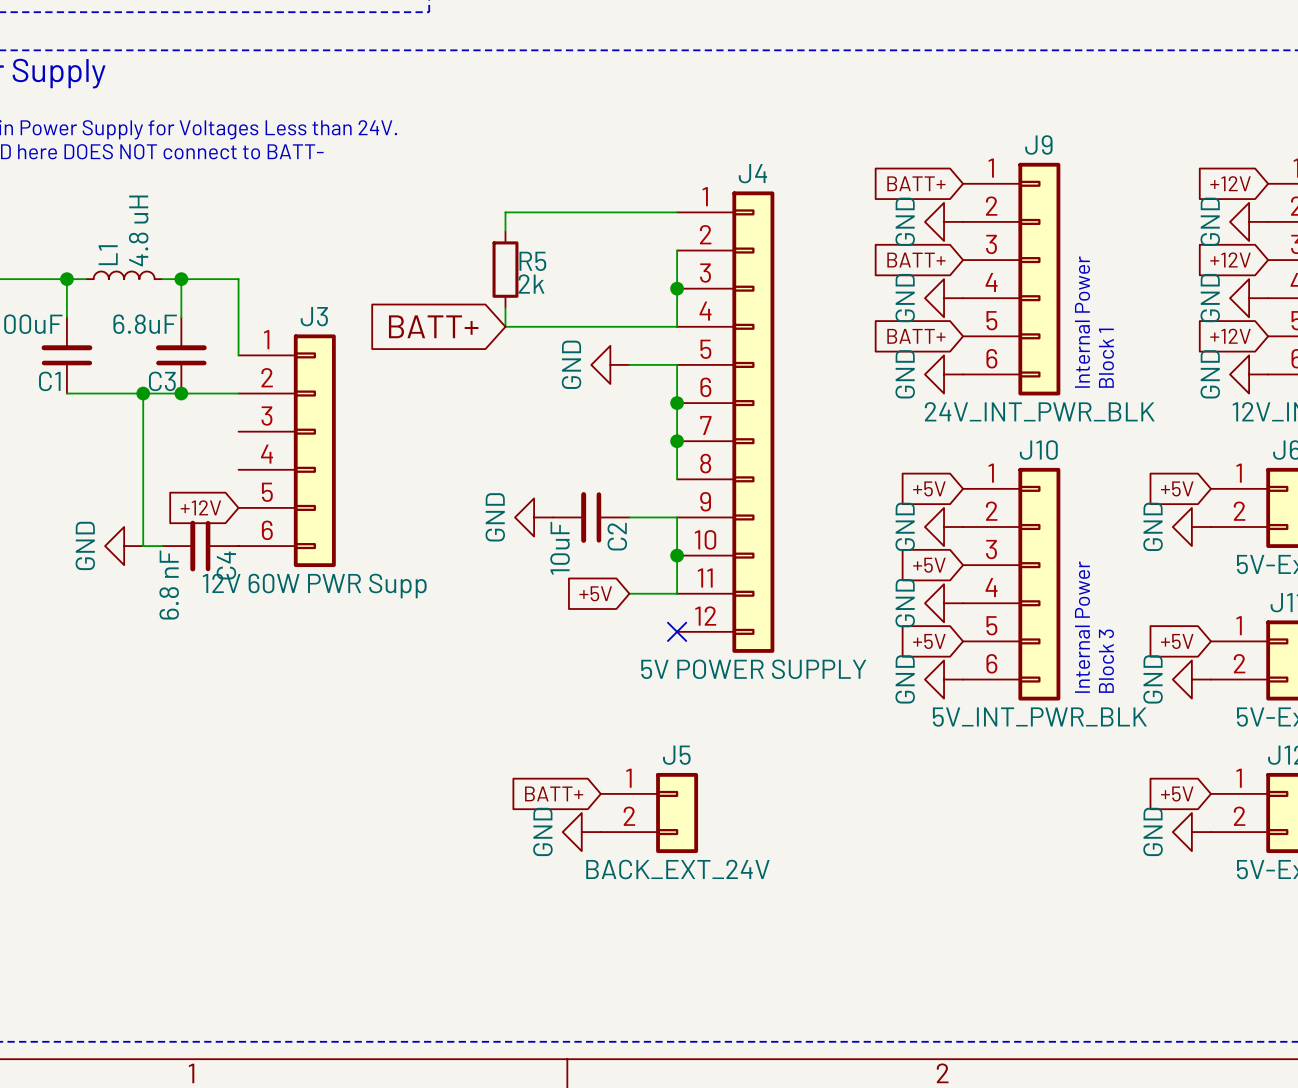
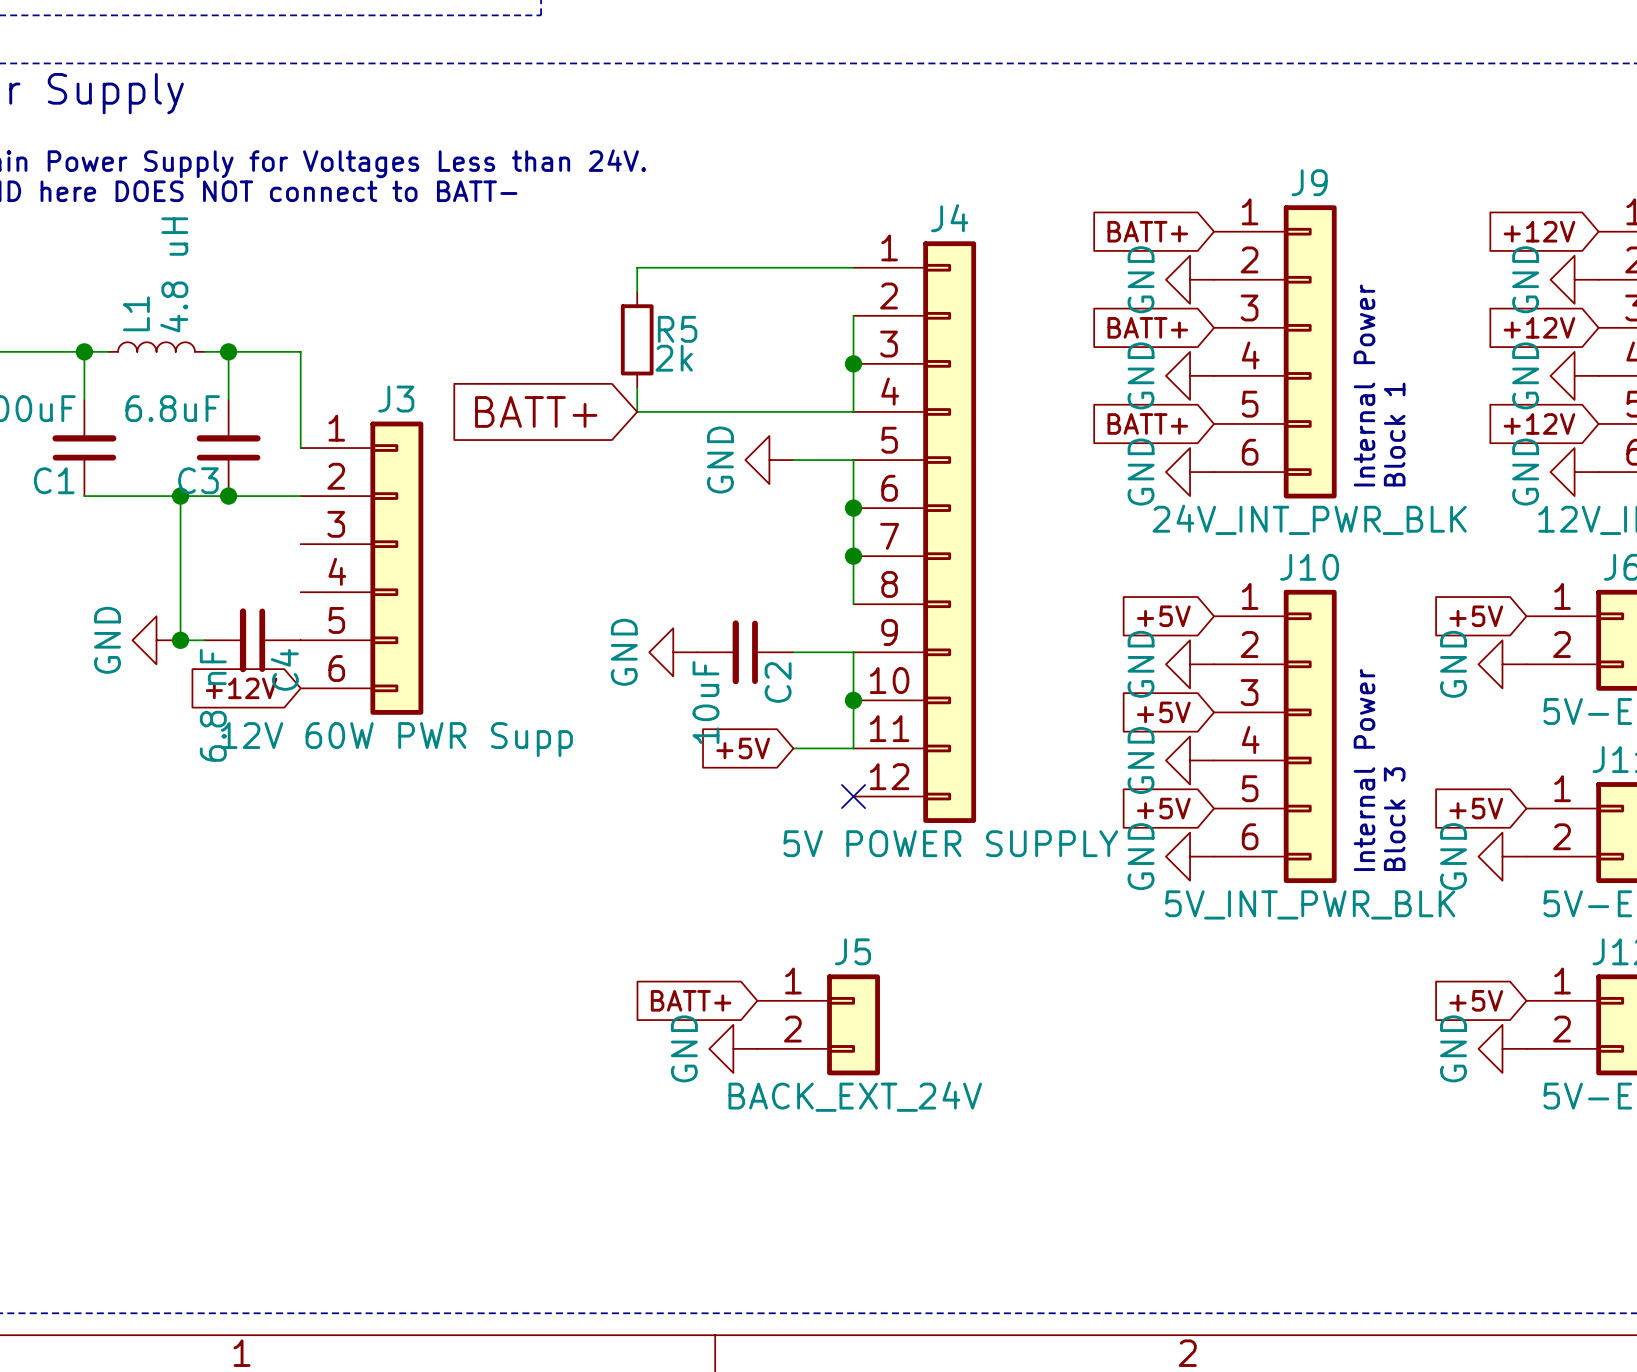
wire: (143, 507) (143, 546) (162, 546) -> (180, 640) (204, 640)
junction: none -> (180, 640)
global label position: +12V (200, 507) -> +12V (241, 688)
power symbol position: GND (124, 546) -> GND (156, 640)
C4 position: (200, 546) -> (252, 640)

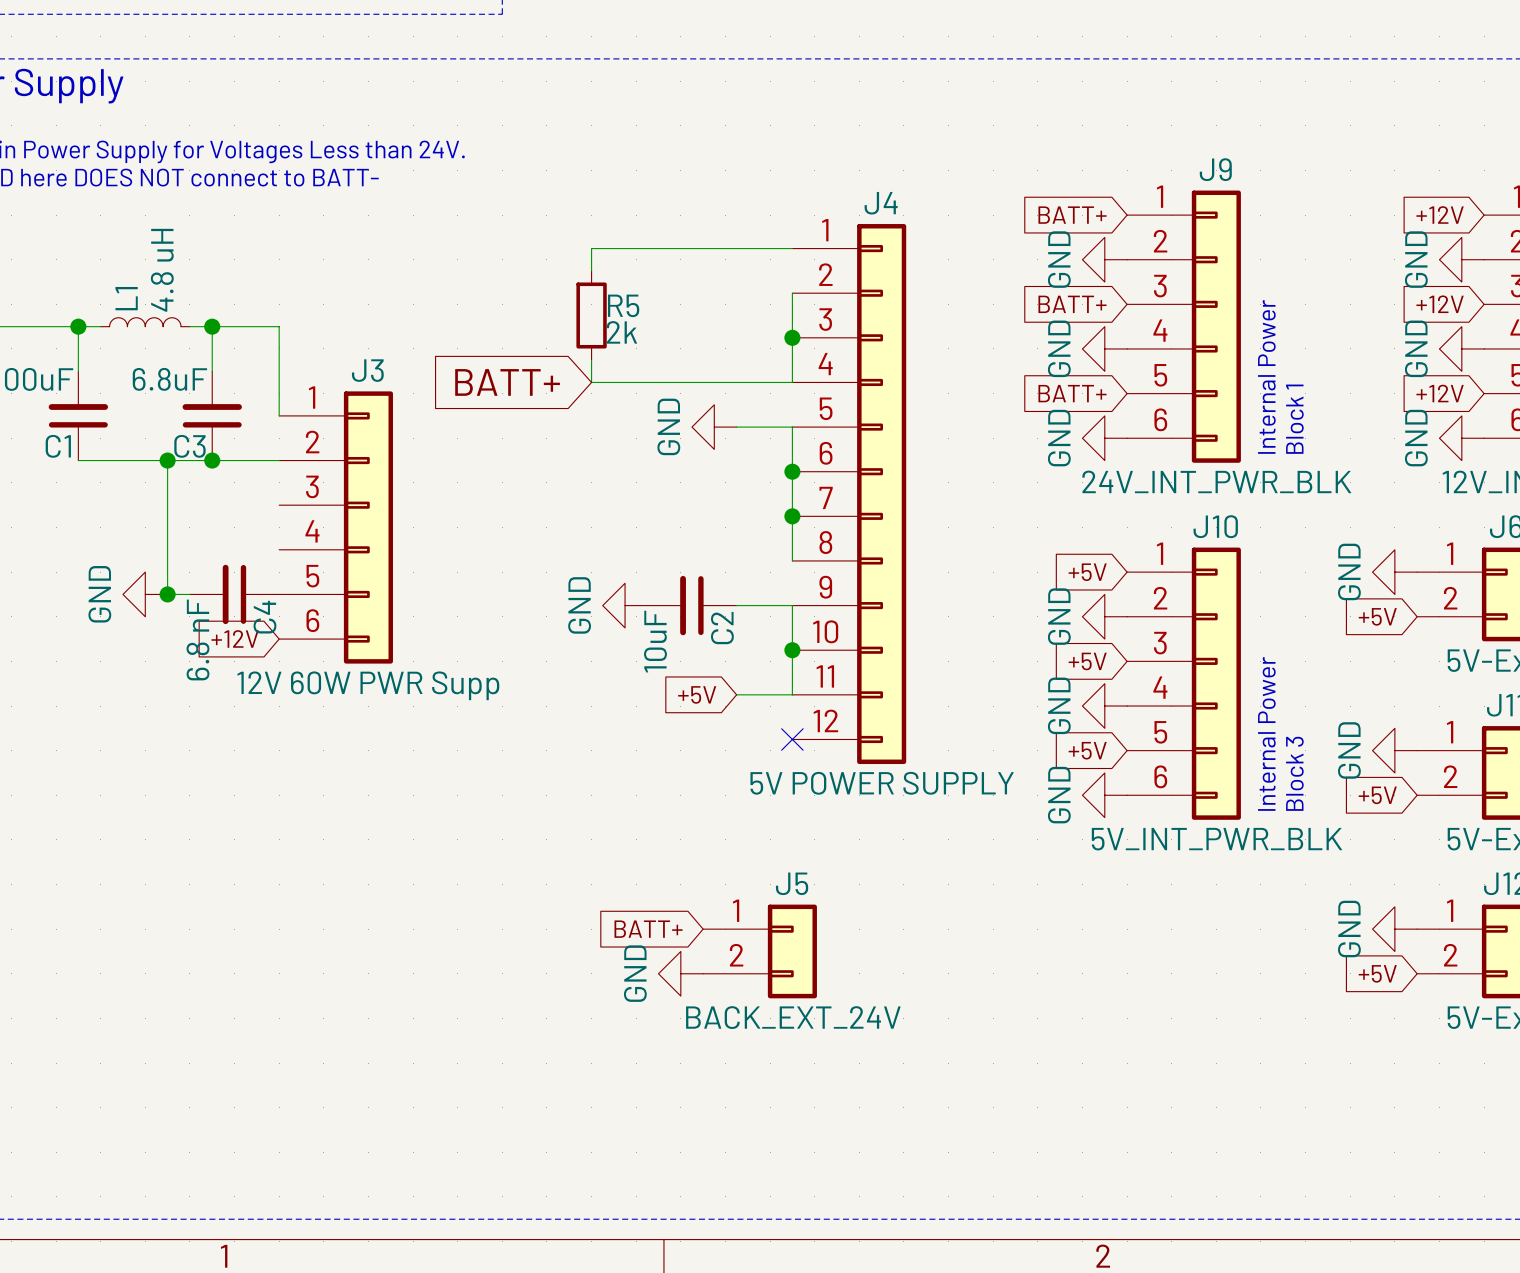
global label position: +5V (1476, 616) -> +5V (1377, 616)
power symbol position: GND (1502, 664) -> GND (1394, 572)
global label position: +5V (1476, 808) -> +5V (1377, 795)
power symbol position: GND (1502, 856) -> GND (1394, 750)
global label position: +5V (1476, 1000) -> +5V (1377, 973)
power symbol position: GND (1502, 1048) -> GND (1394, 929)

